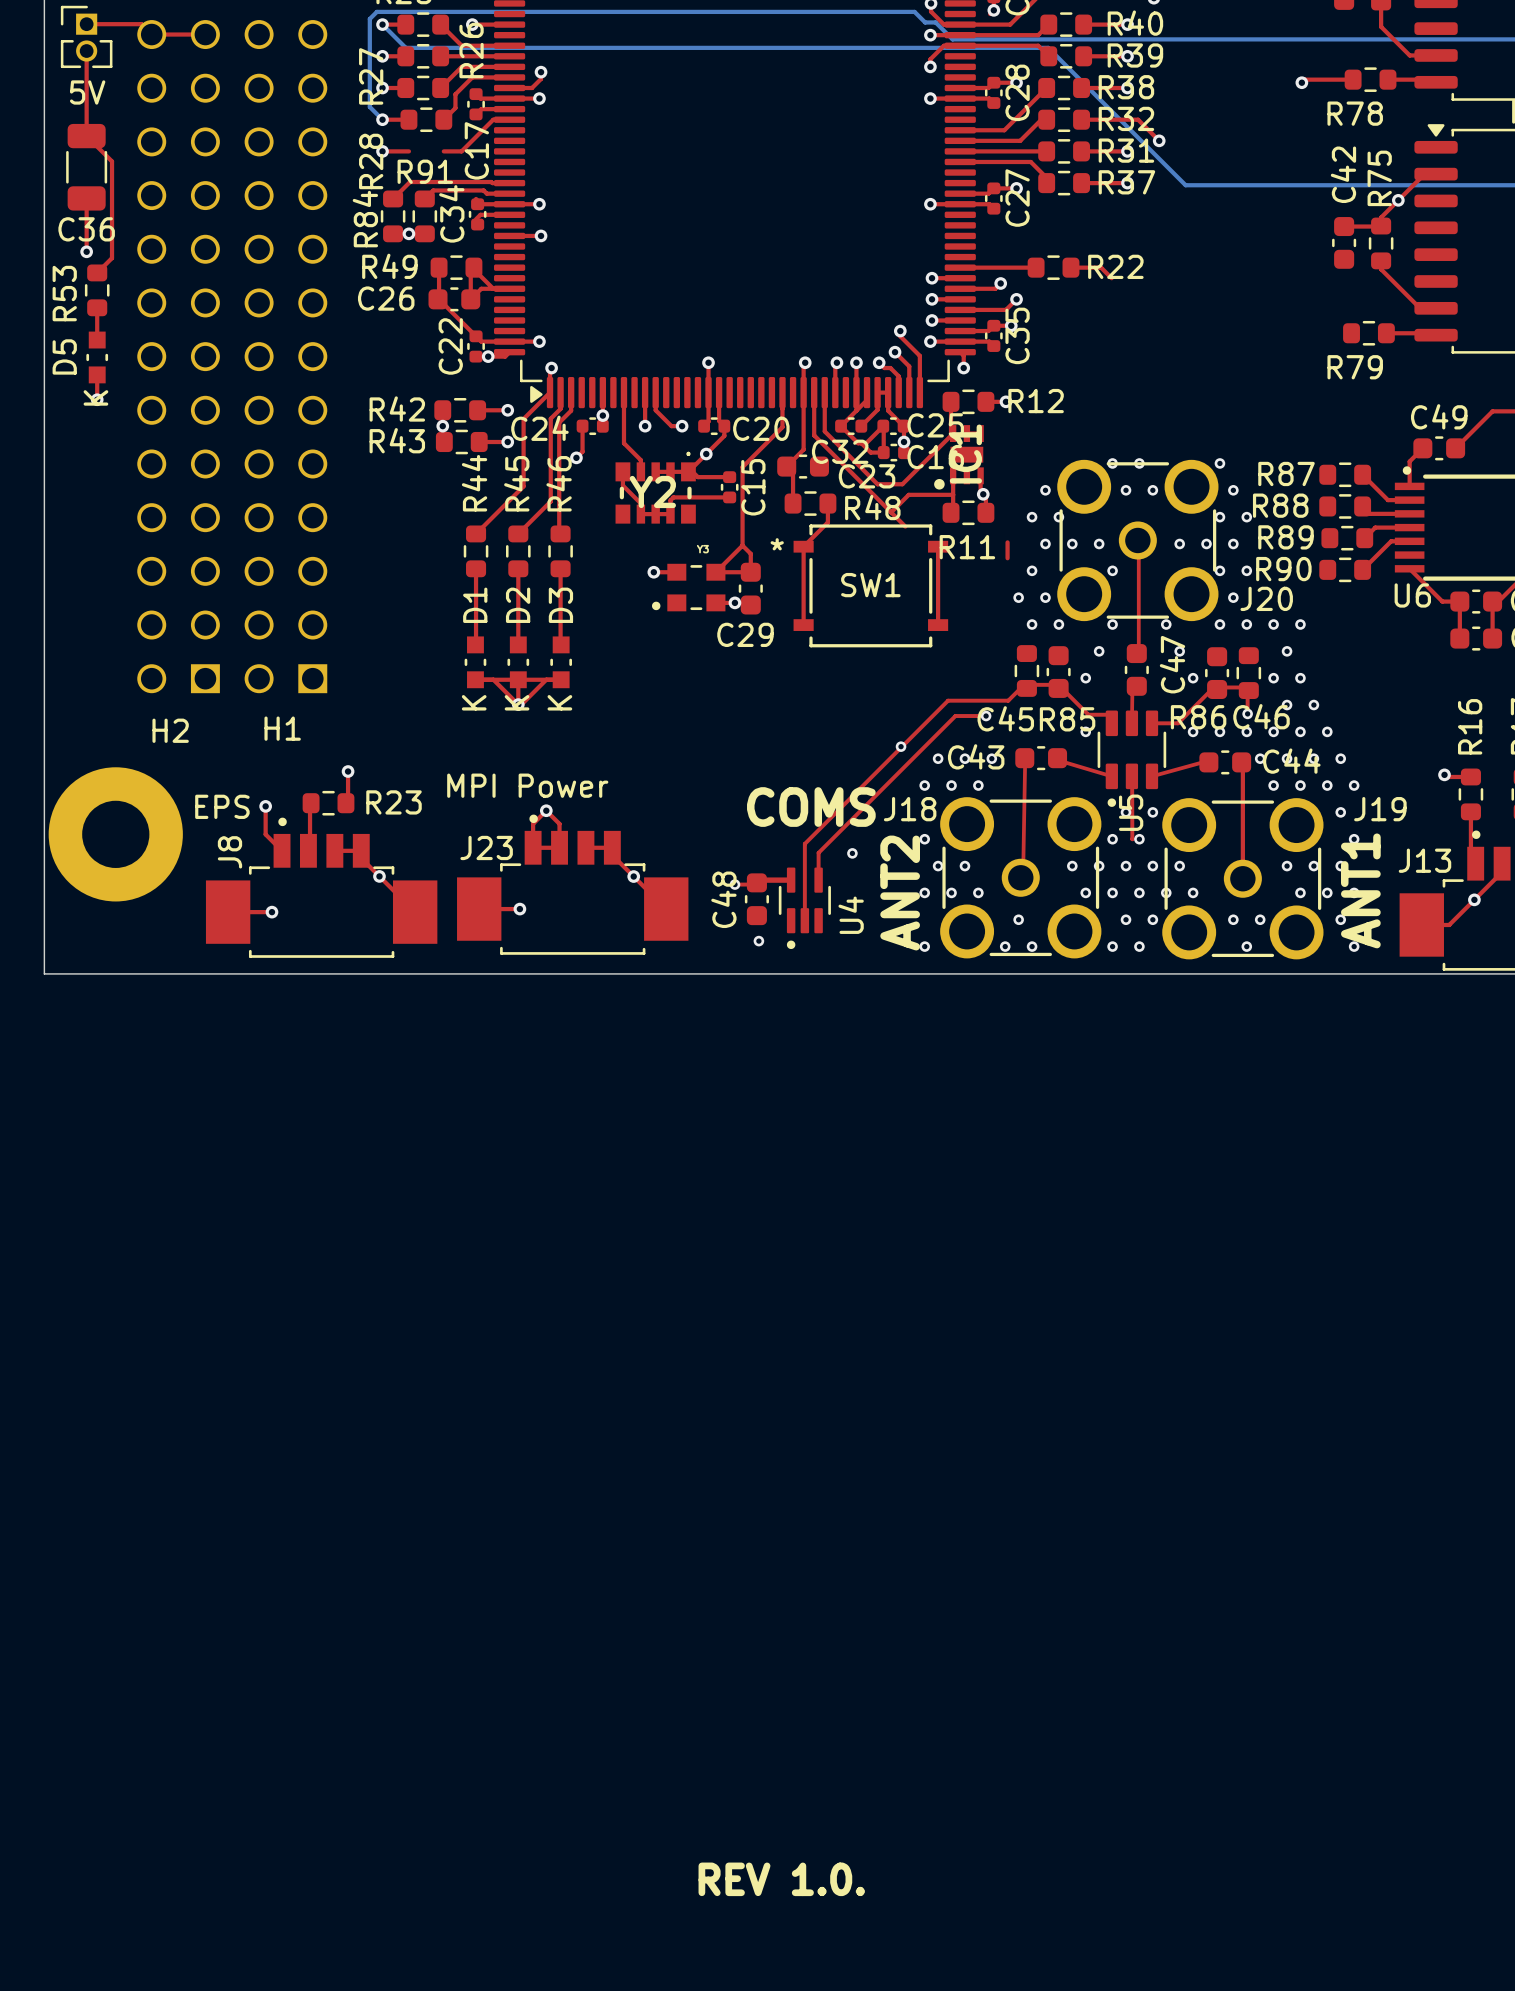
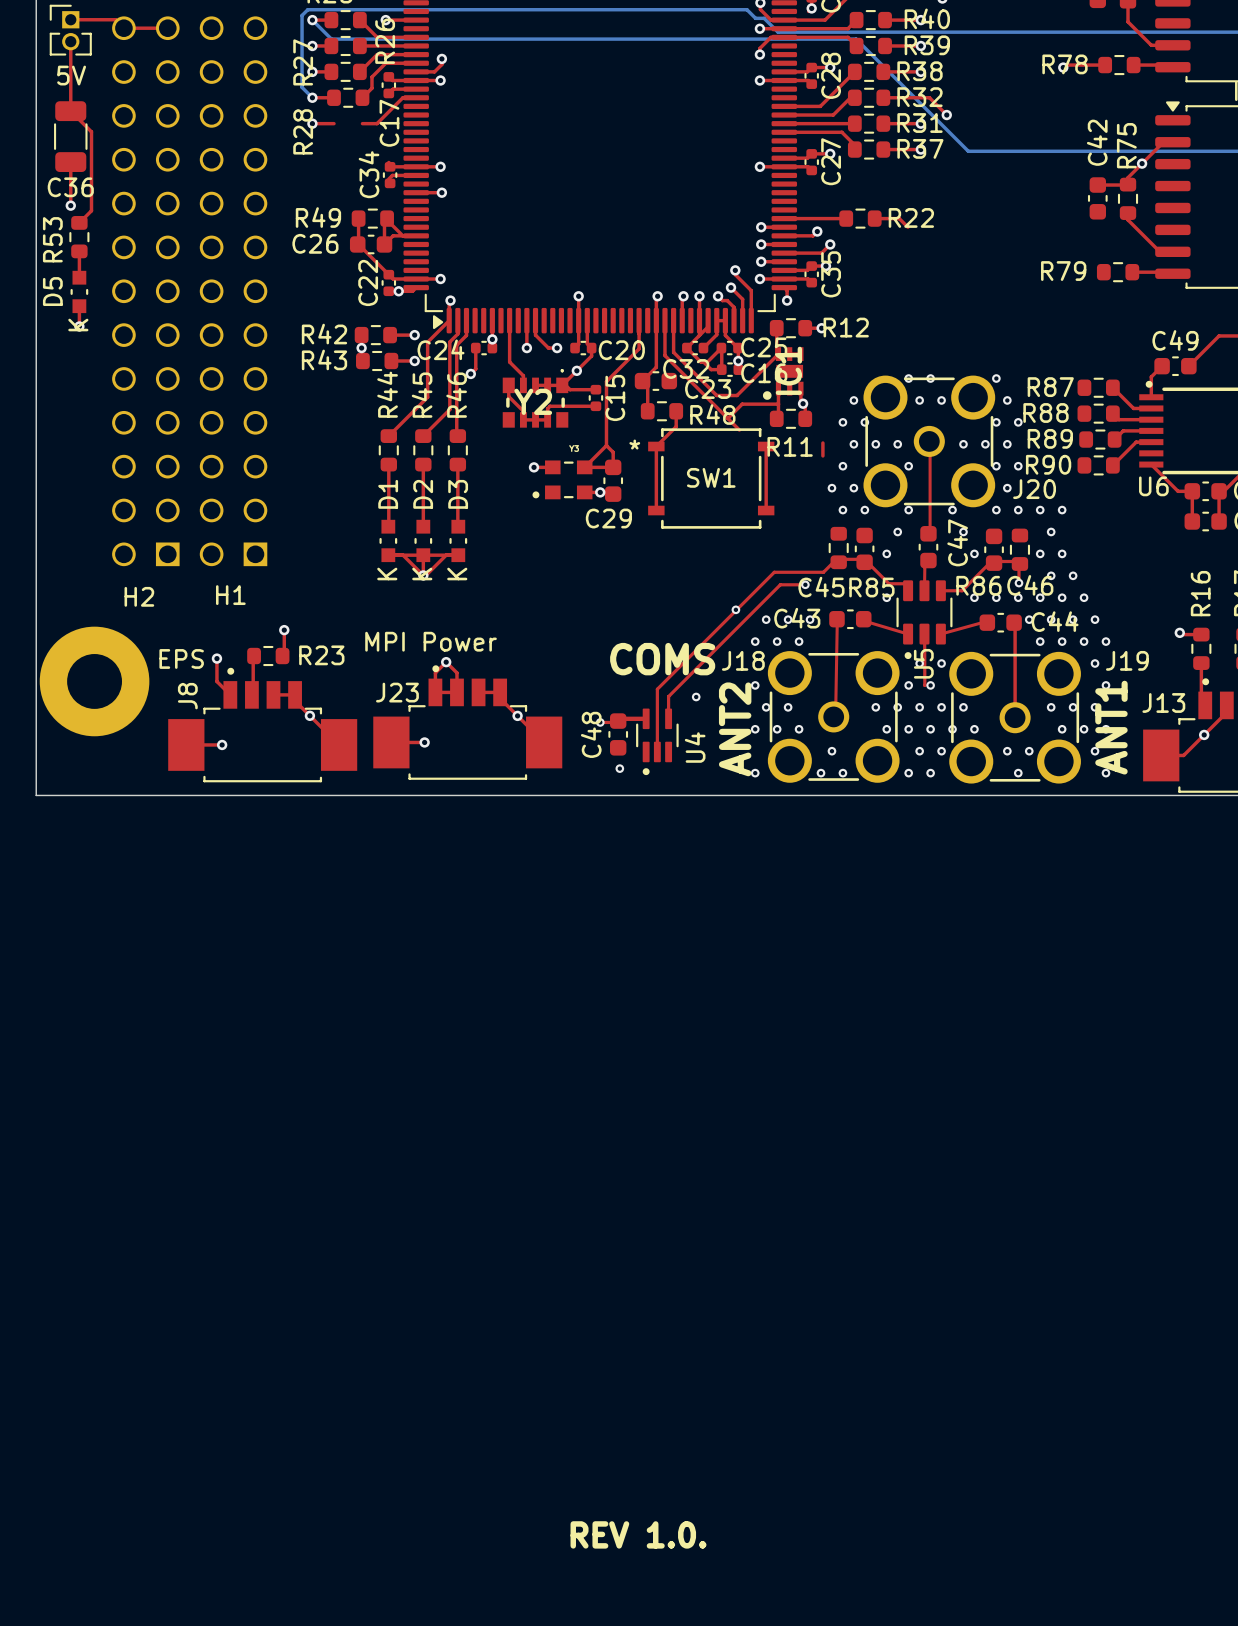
R78 name position: R78 (1355, 113) -> R78 (1064, 64)
top track: (509, 183) (410, 182) (393, 198) -> none
top track: (509, 193) (486, 193) (483, 190) (433, 190) (424, 198) -> none
R84: (393, 216) -> none
R91: (424, 216) -> none
via: (408, 233) -> none
R79 name position: R79 (1355, 367) -> R79 (1063, 271)

